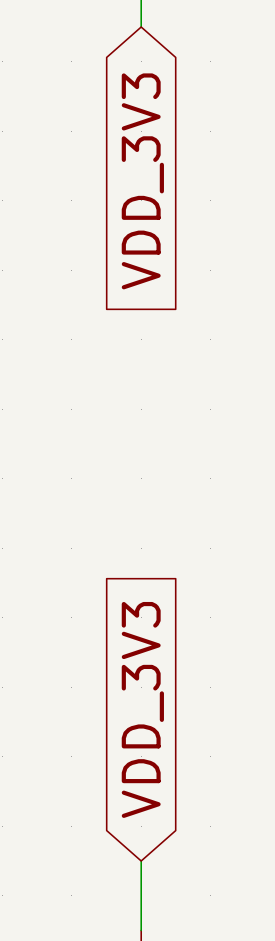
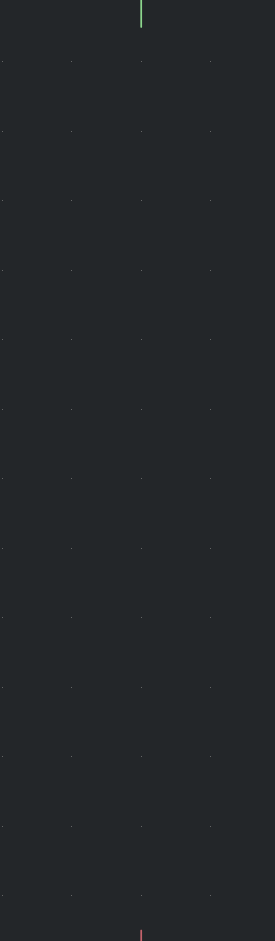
global label: VDD_3V3 (142, 181) -> none
global label: VDD_3V3 (142, 709) -> none
wire: (141, 860) (141, 930) -> none

